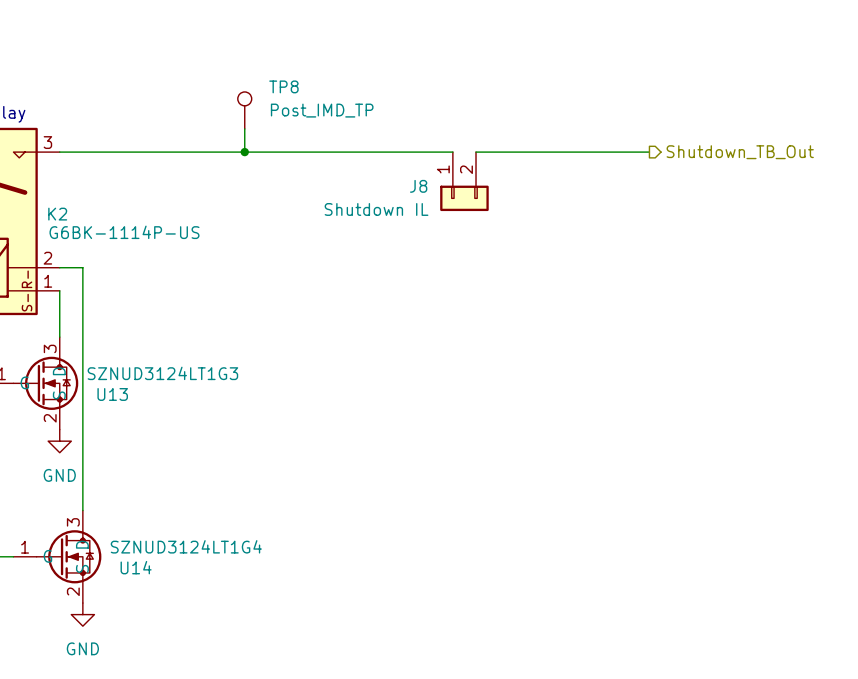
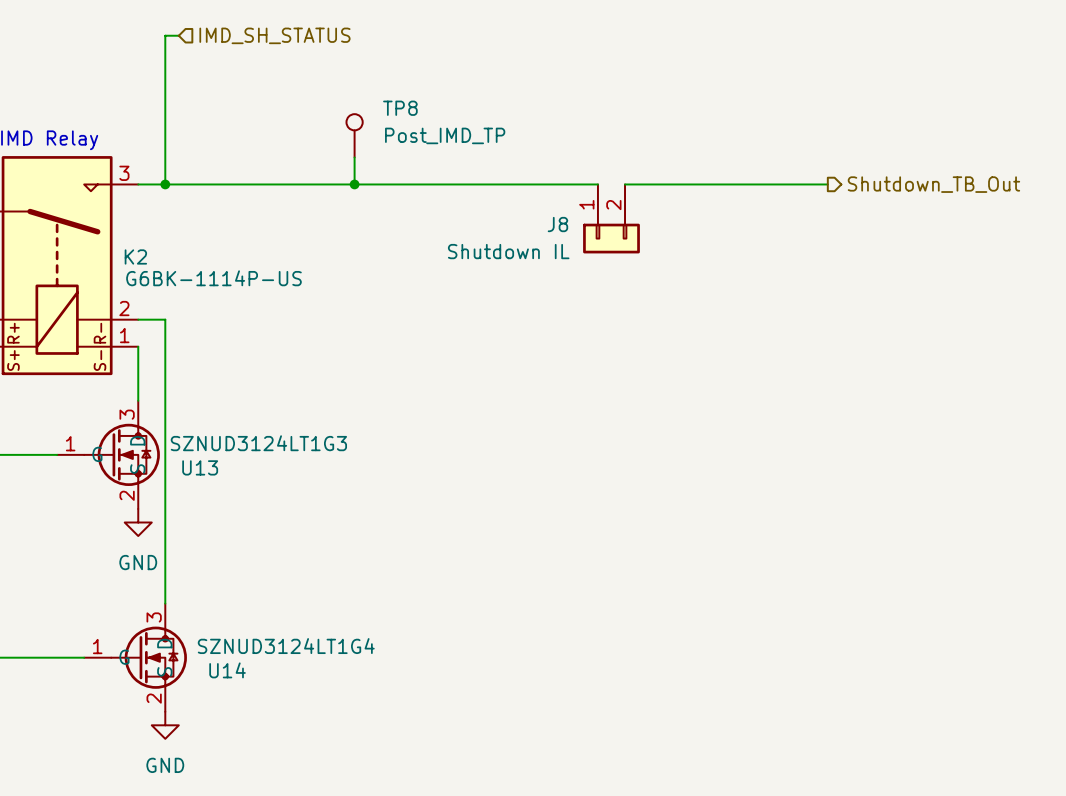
wire: none -> (178, 35) (165, 35) (165, 184)
hierarchical label: none -> IMD_SH_STATUS (274, 35)
junction: none -> (165, 184)

